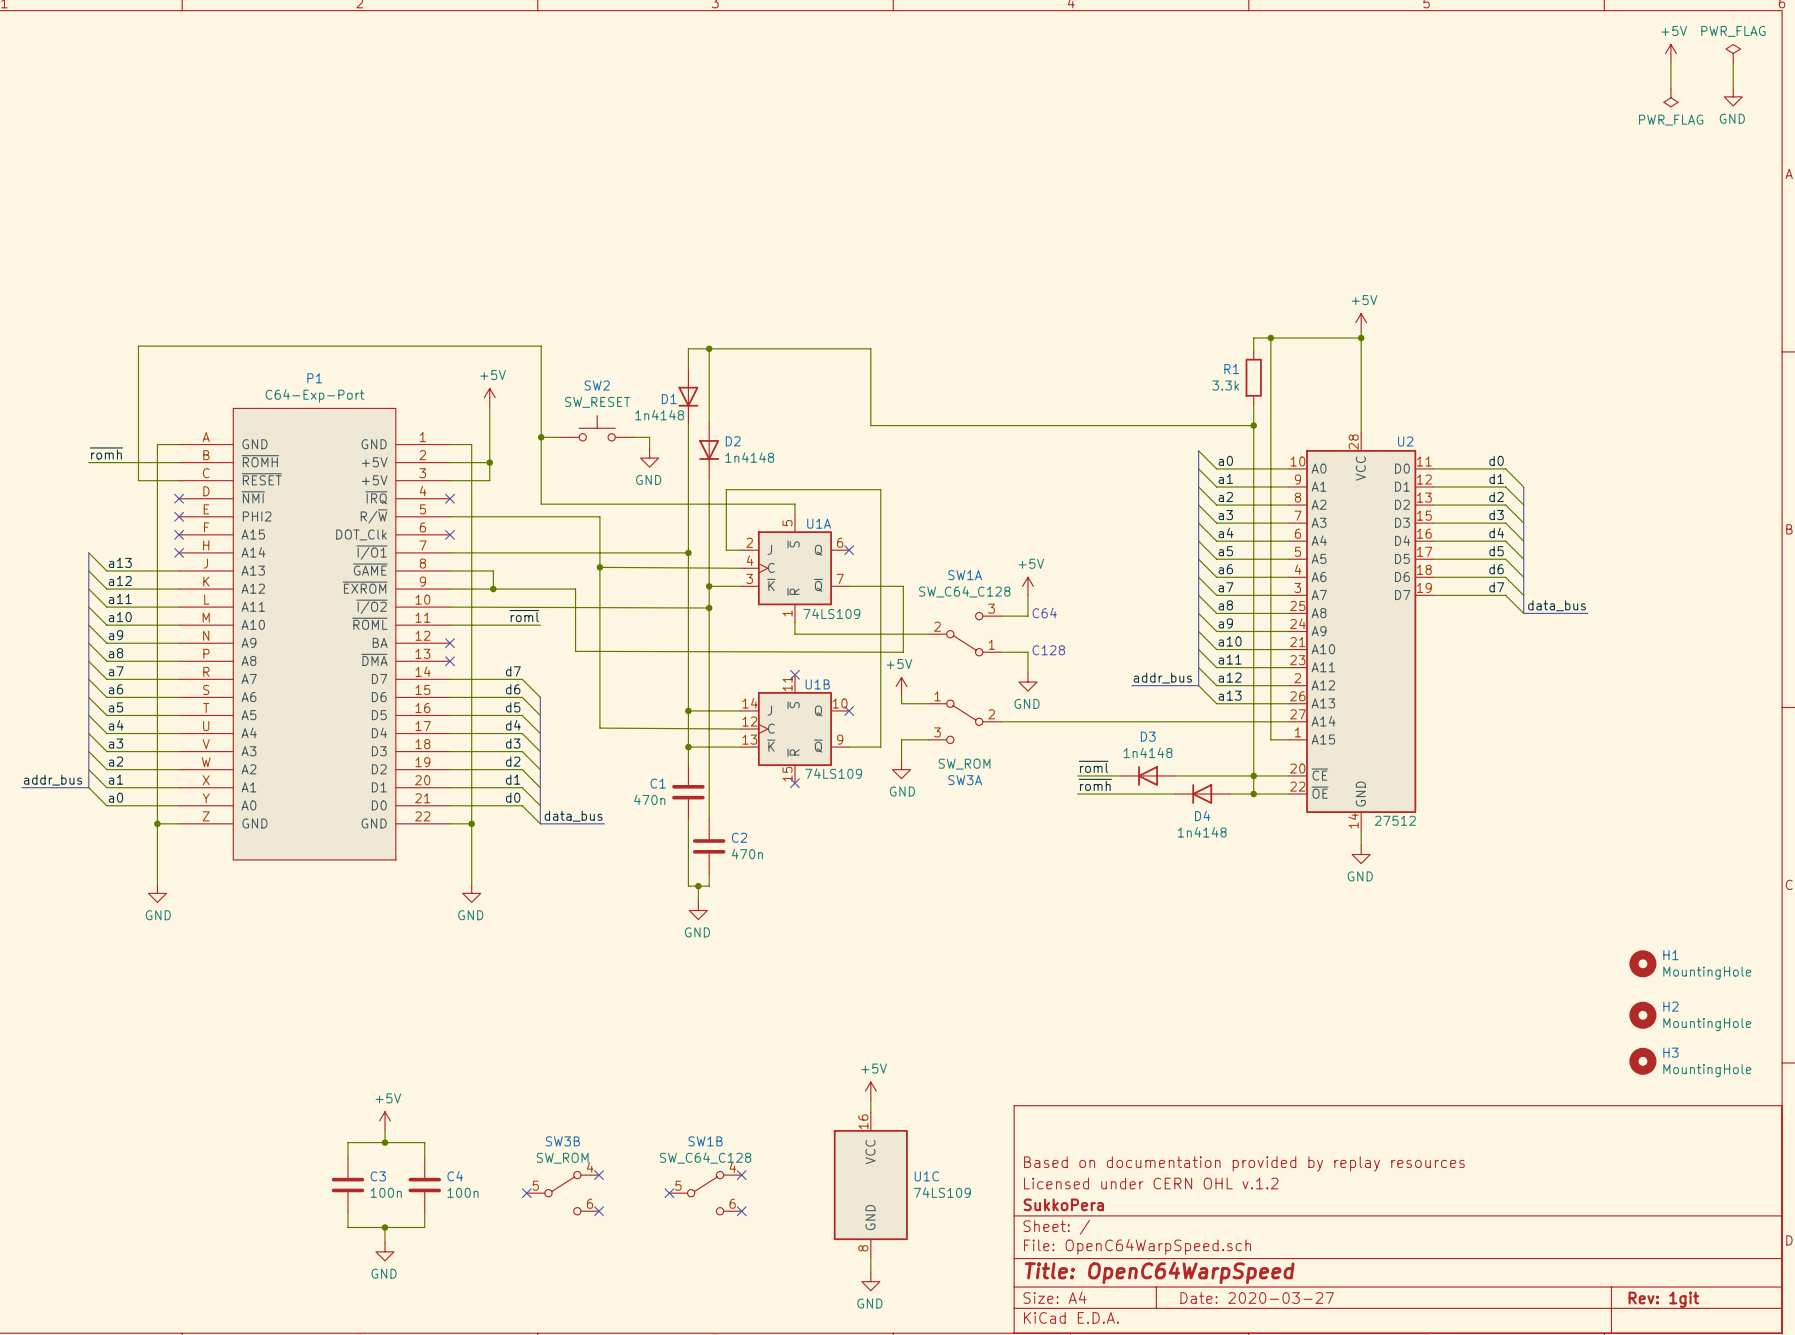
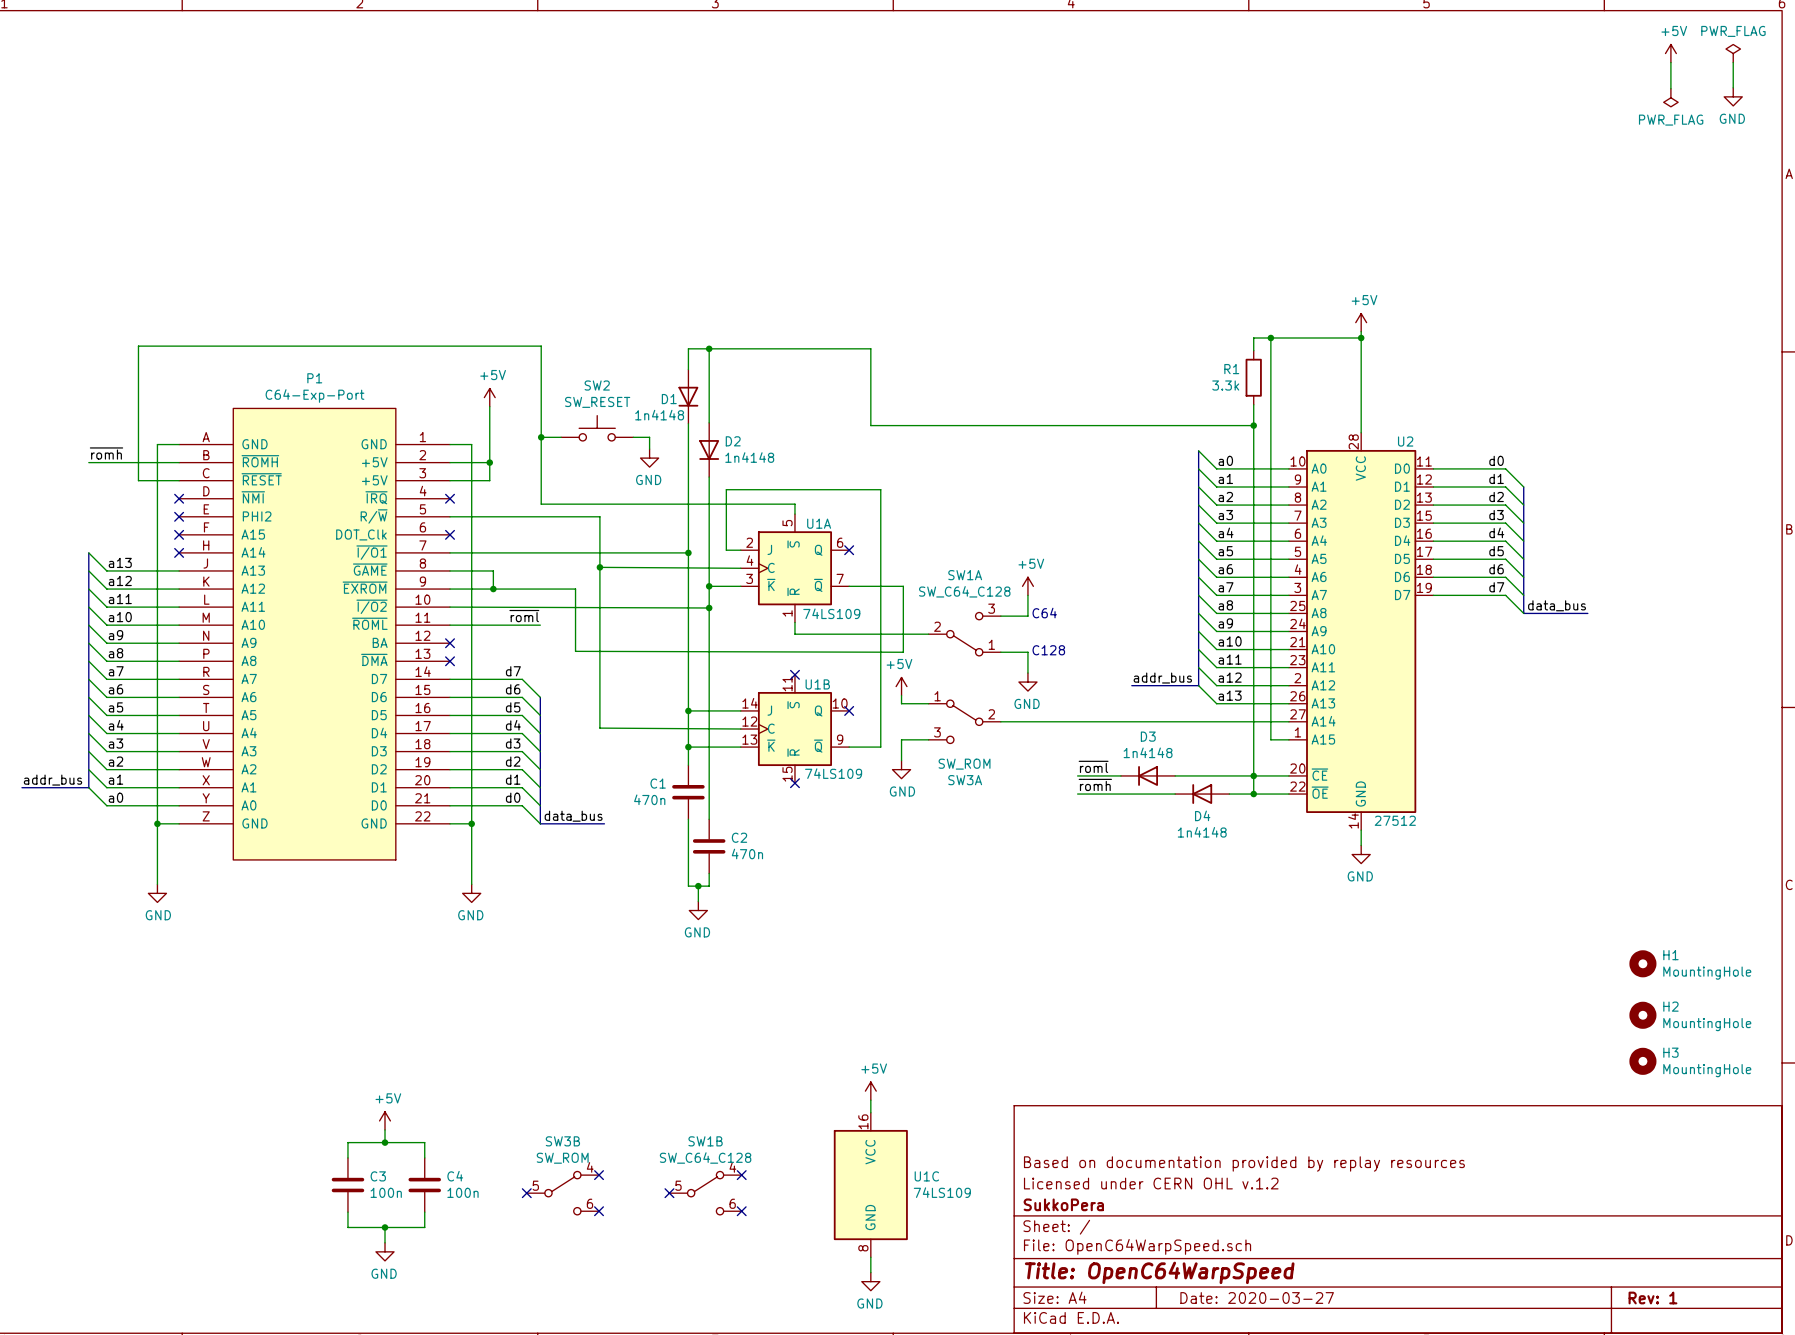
title block: Rev: 1git (1663, 1299) -> Rev: 1 (1652, 1298)

